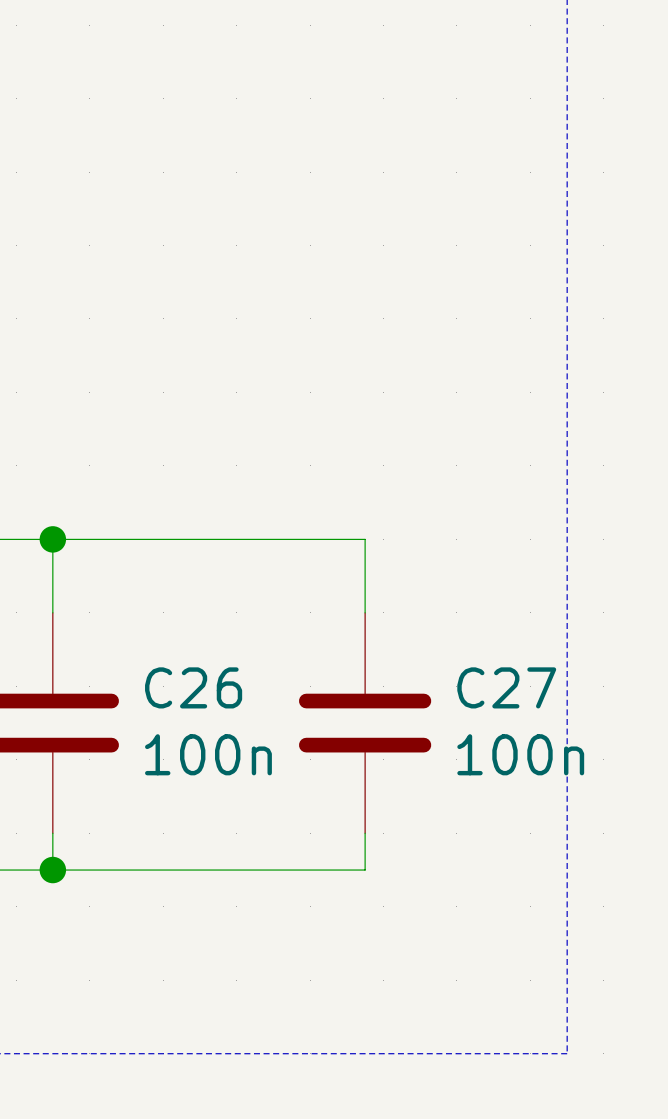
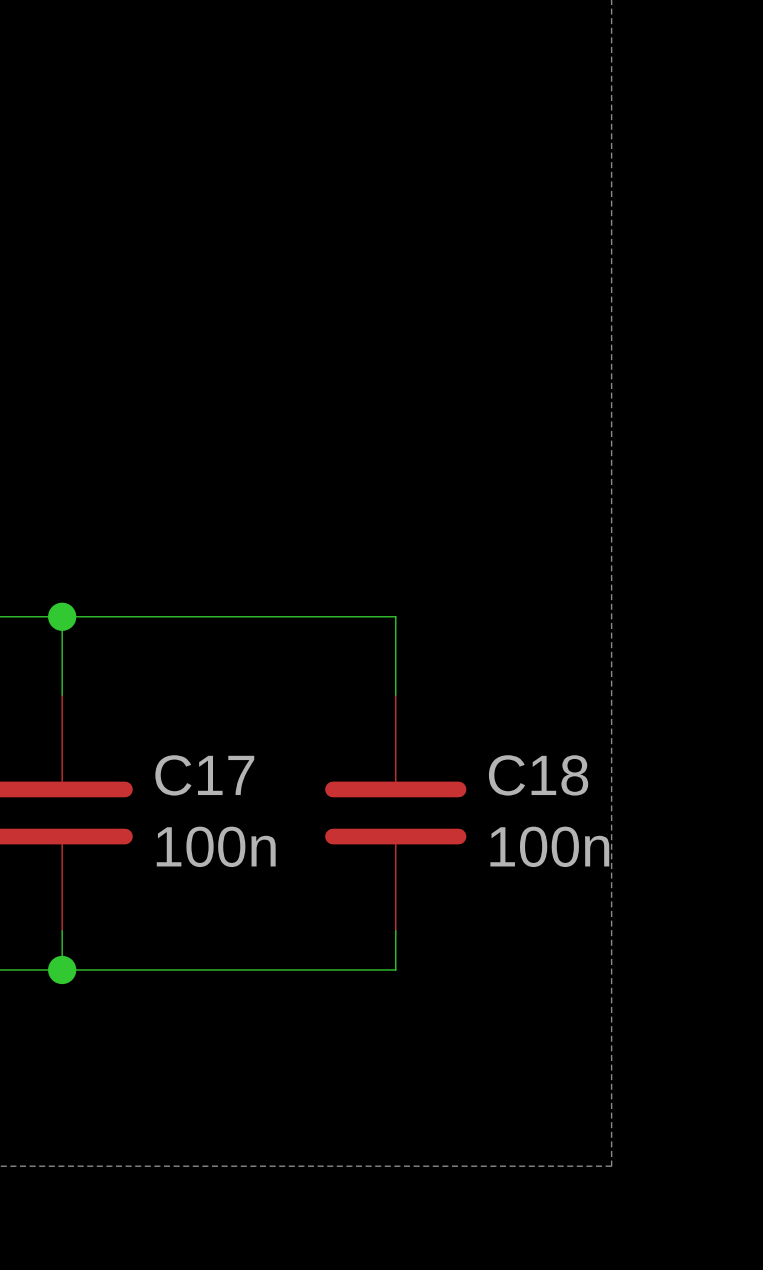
C26 name: C26 (193, 687) -> C17 (204, 775)
C27 name: C27 (506, 687) -> C18 (538, 775)

